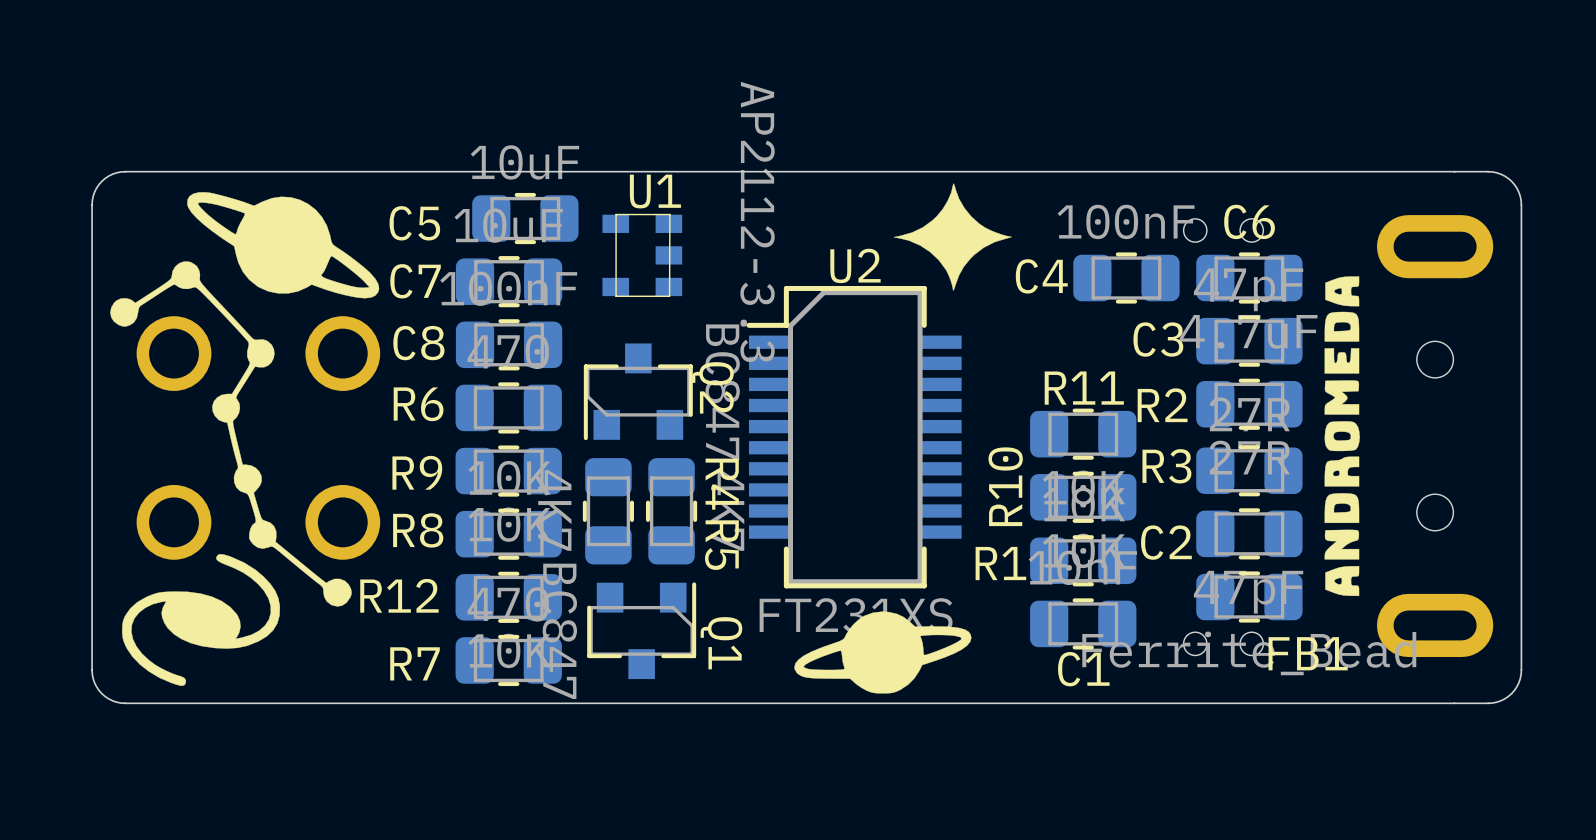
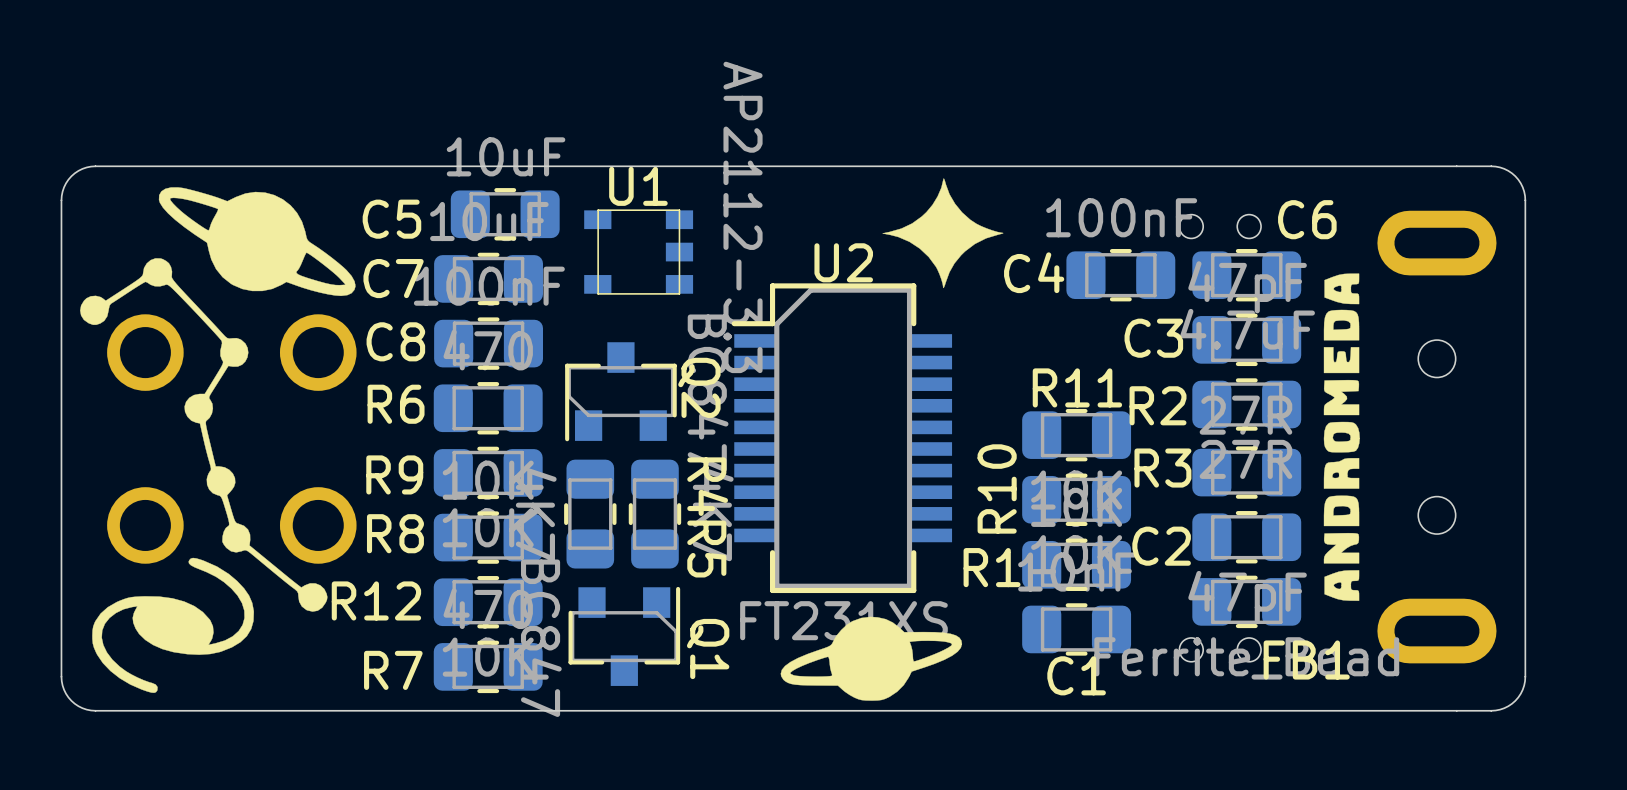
U1 footprint: [602, 214, 683, 297] -> [584, 210, 694, 295]
C6 name position: C6 (1249, 221) -> C6 (1307, 219)

